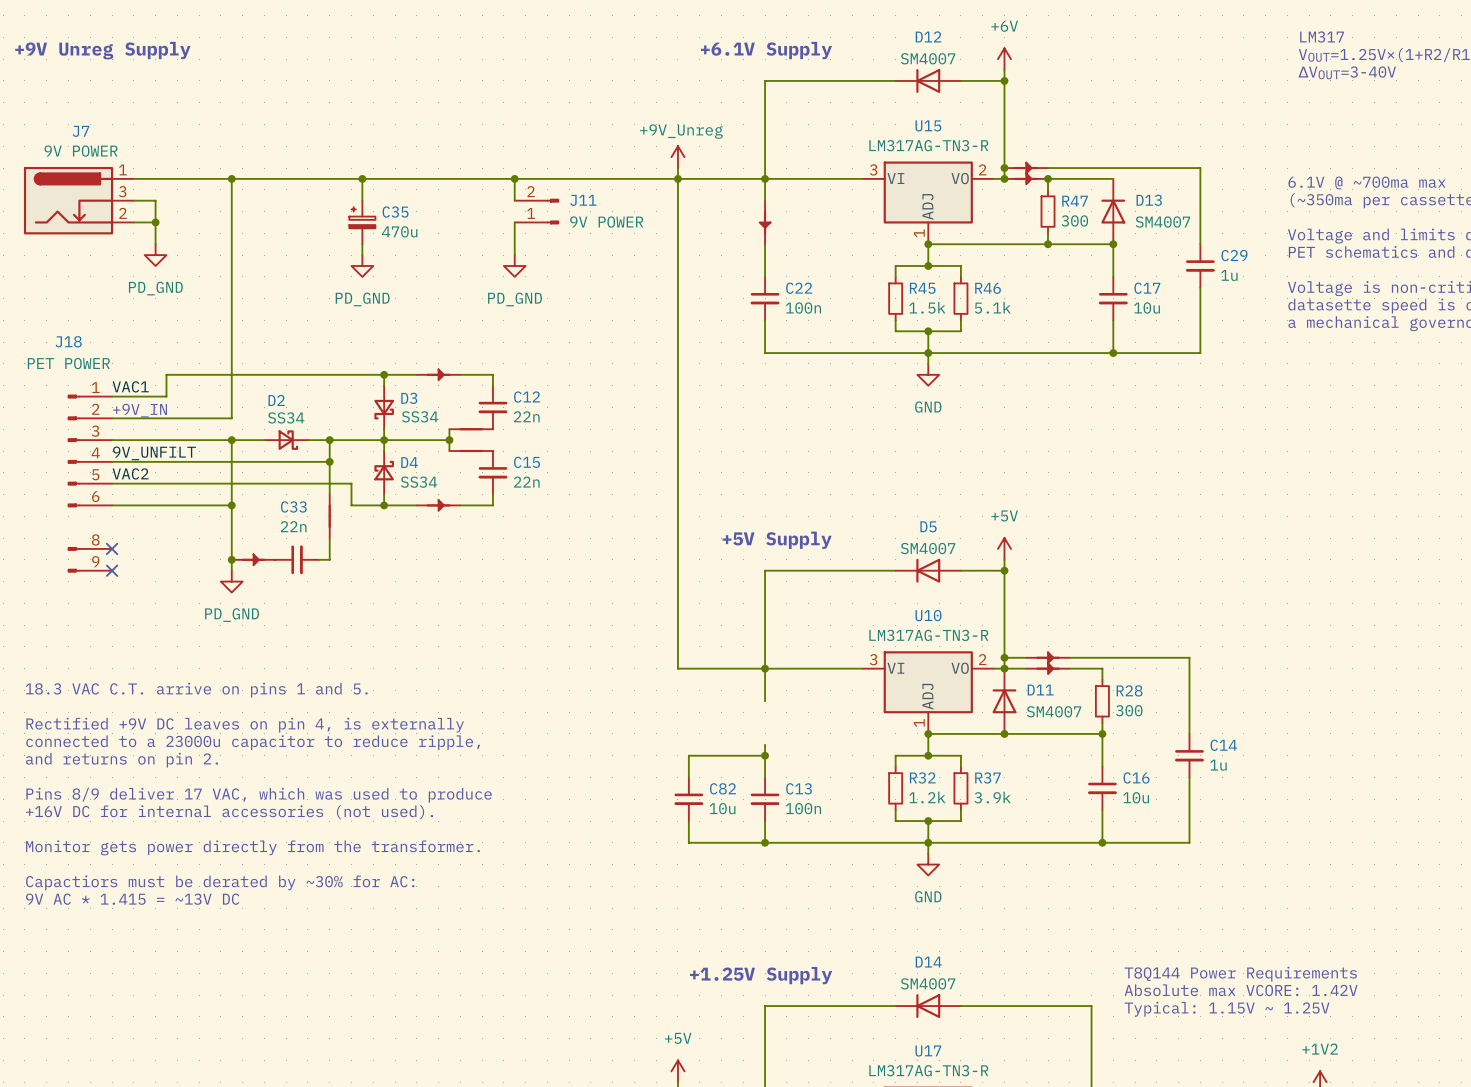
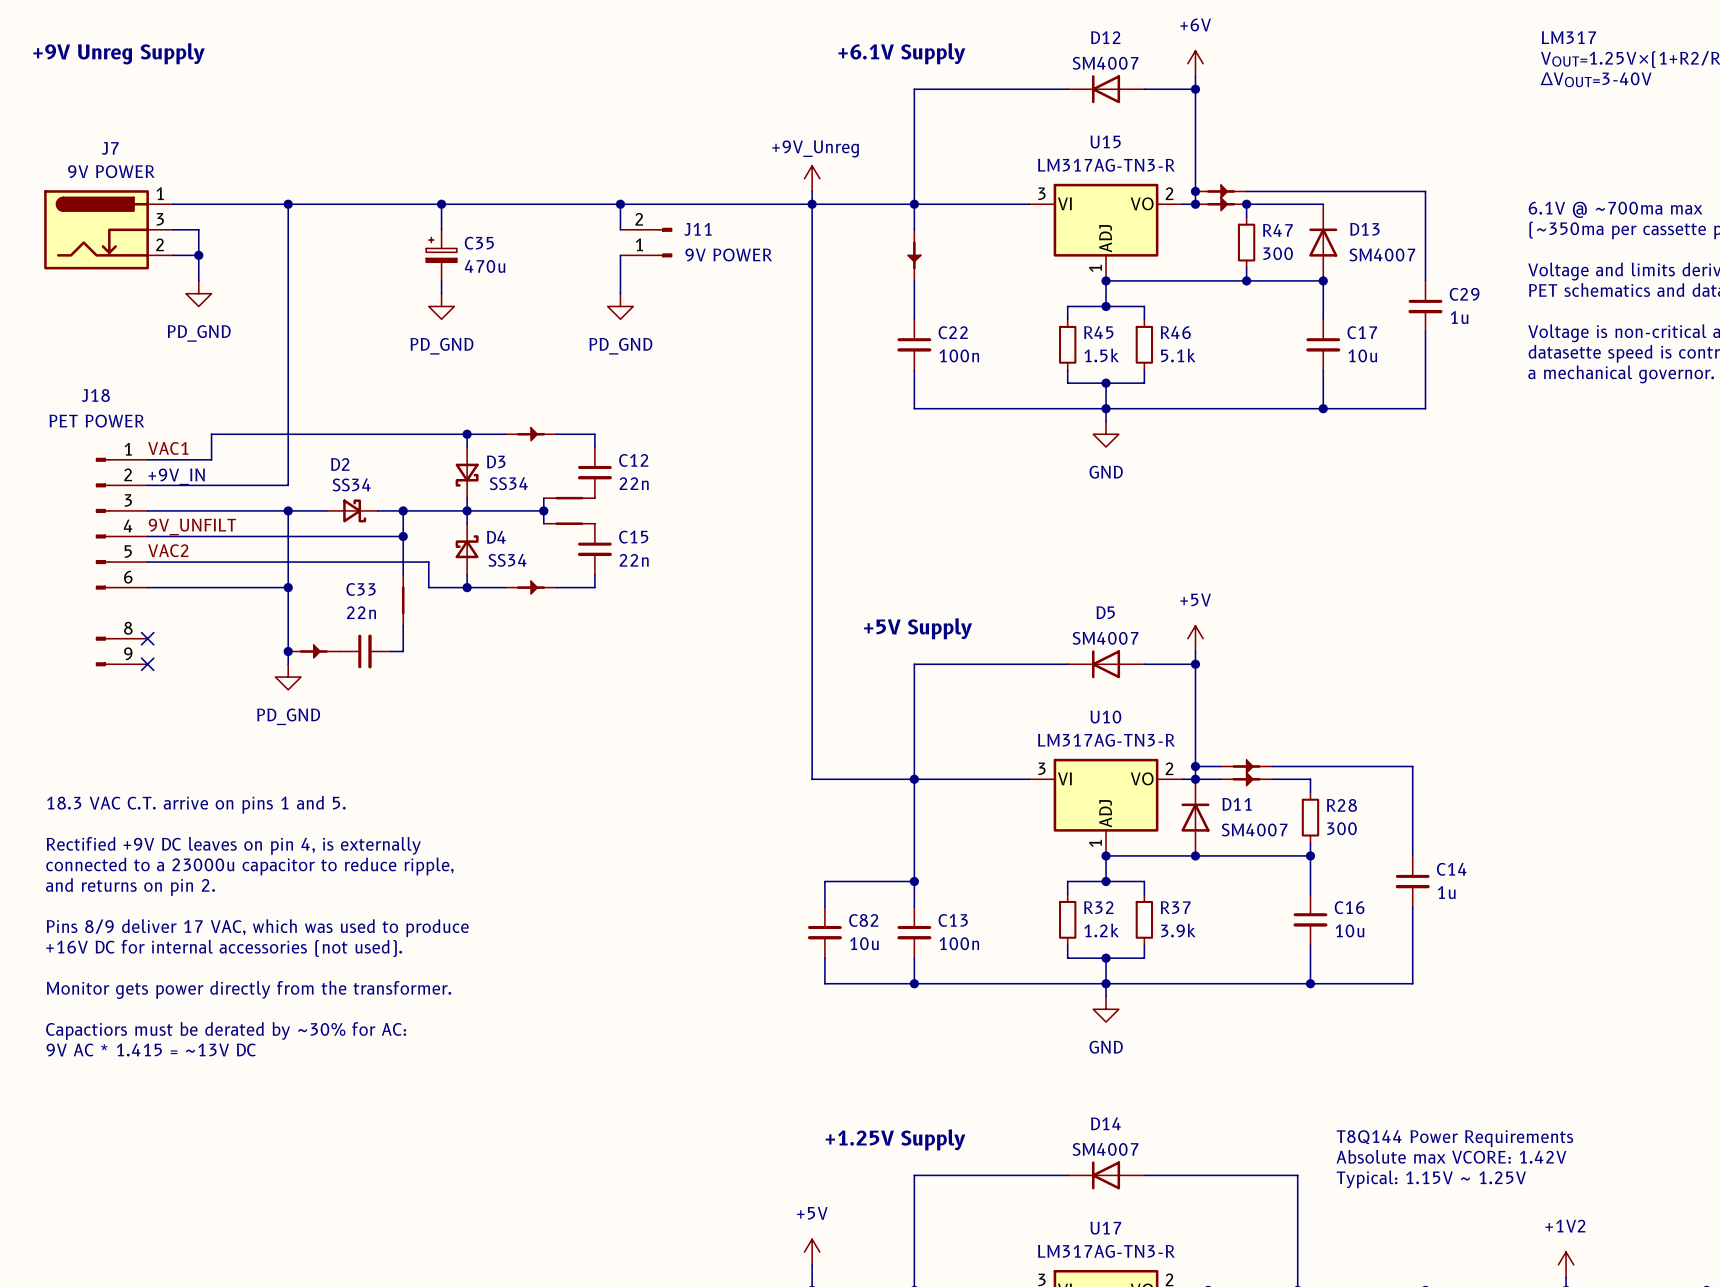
wire: none -> (914, 817) (914, 868)

